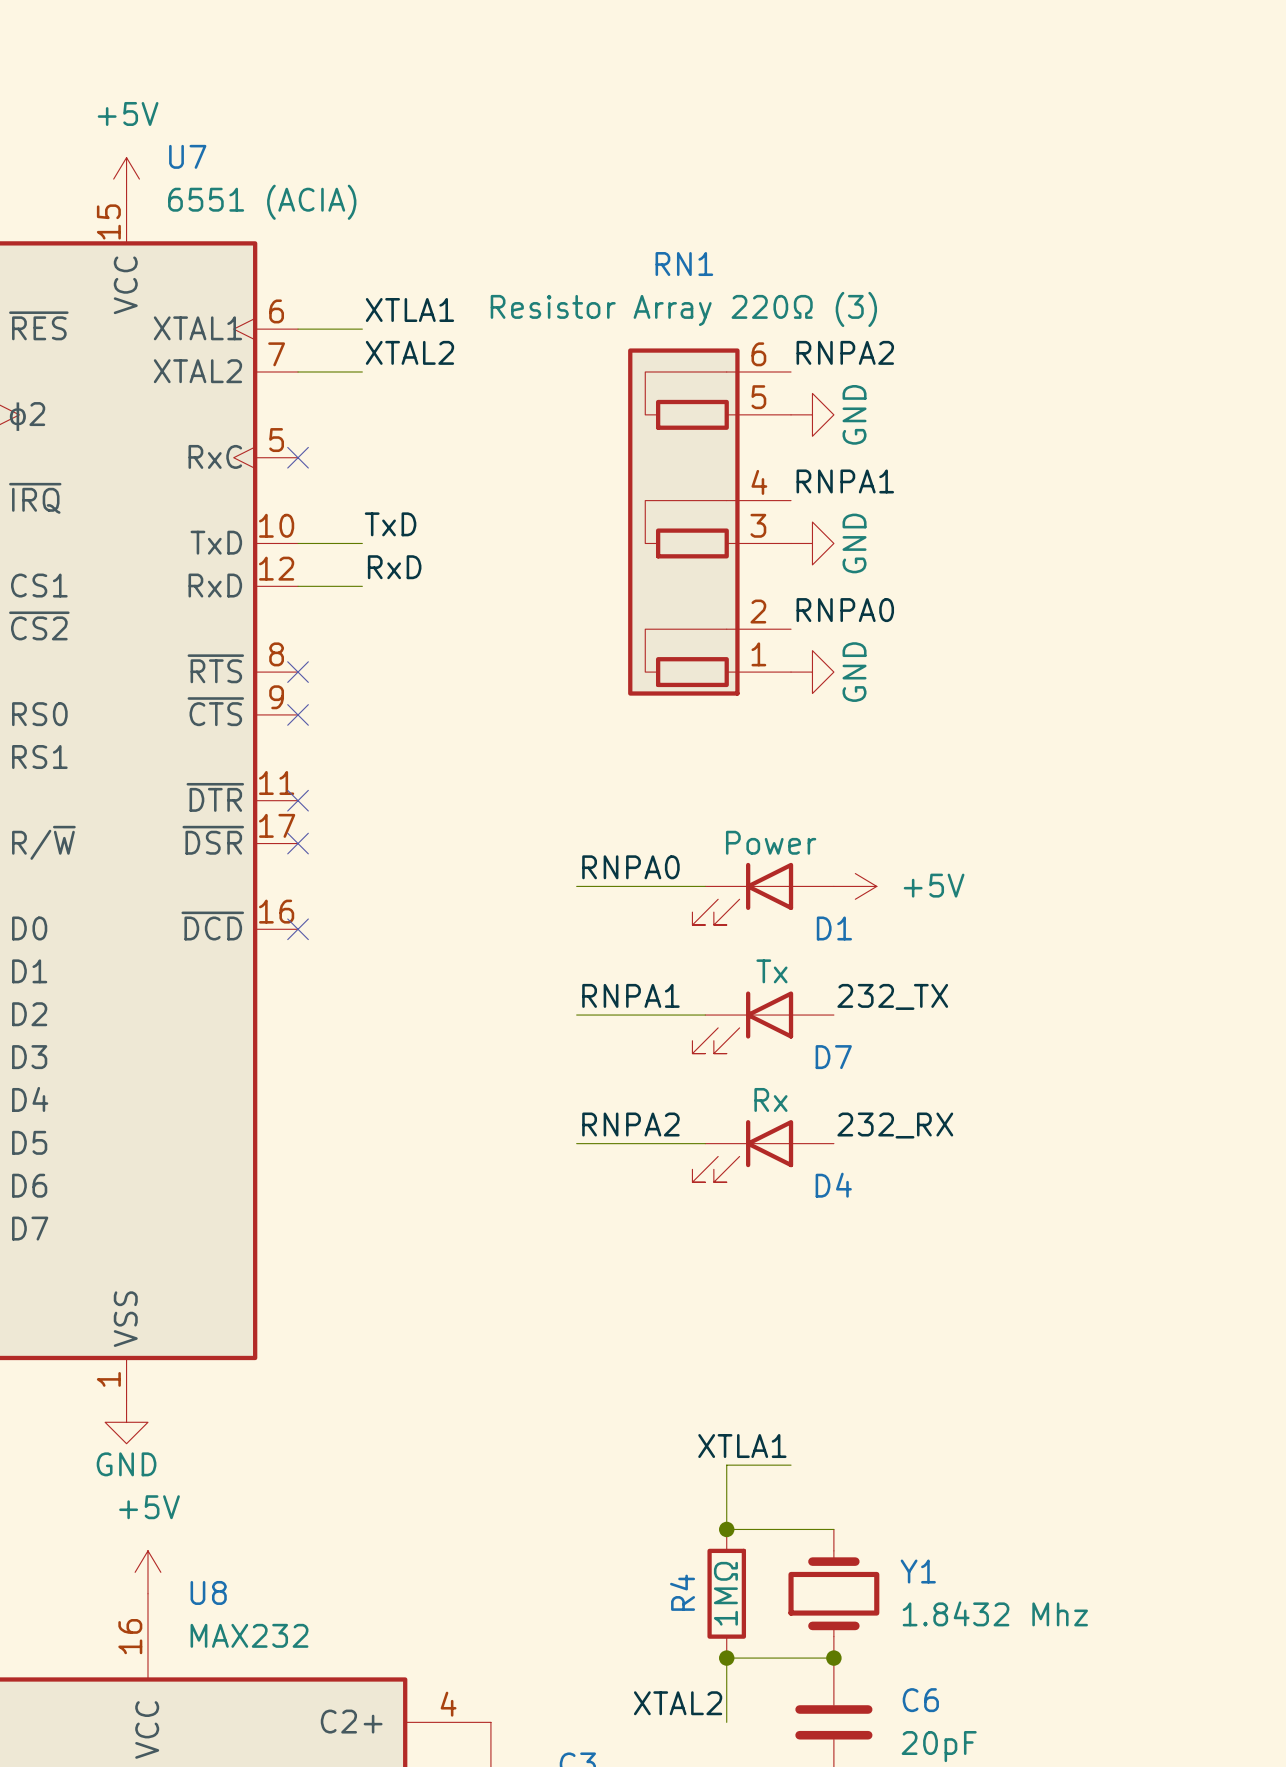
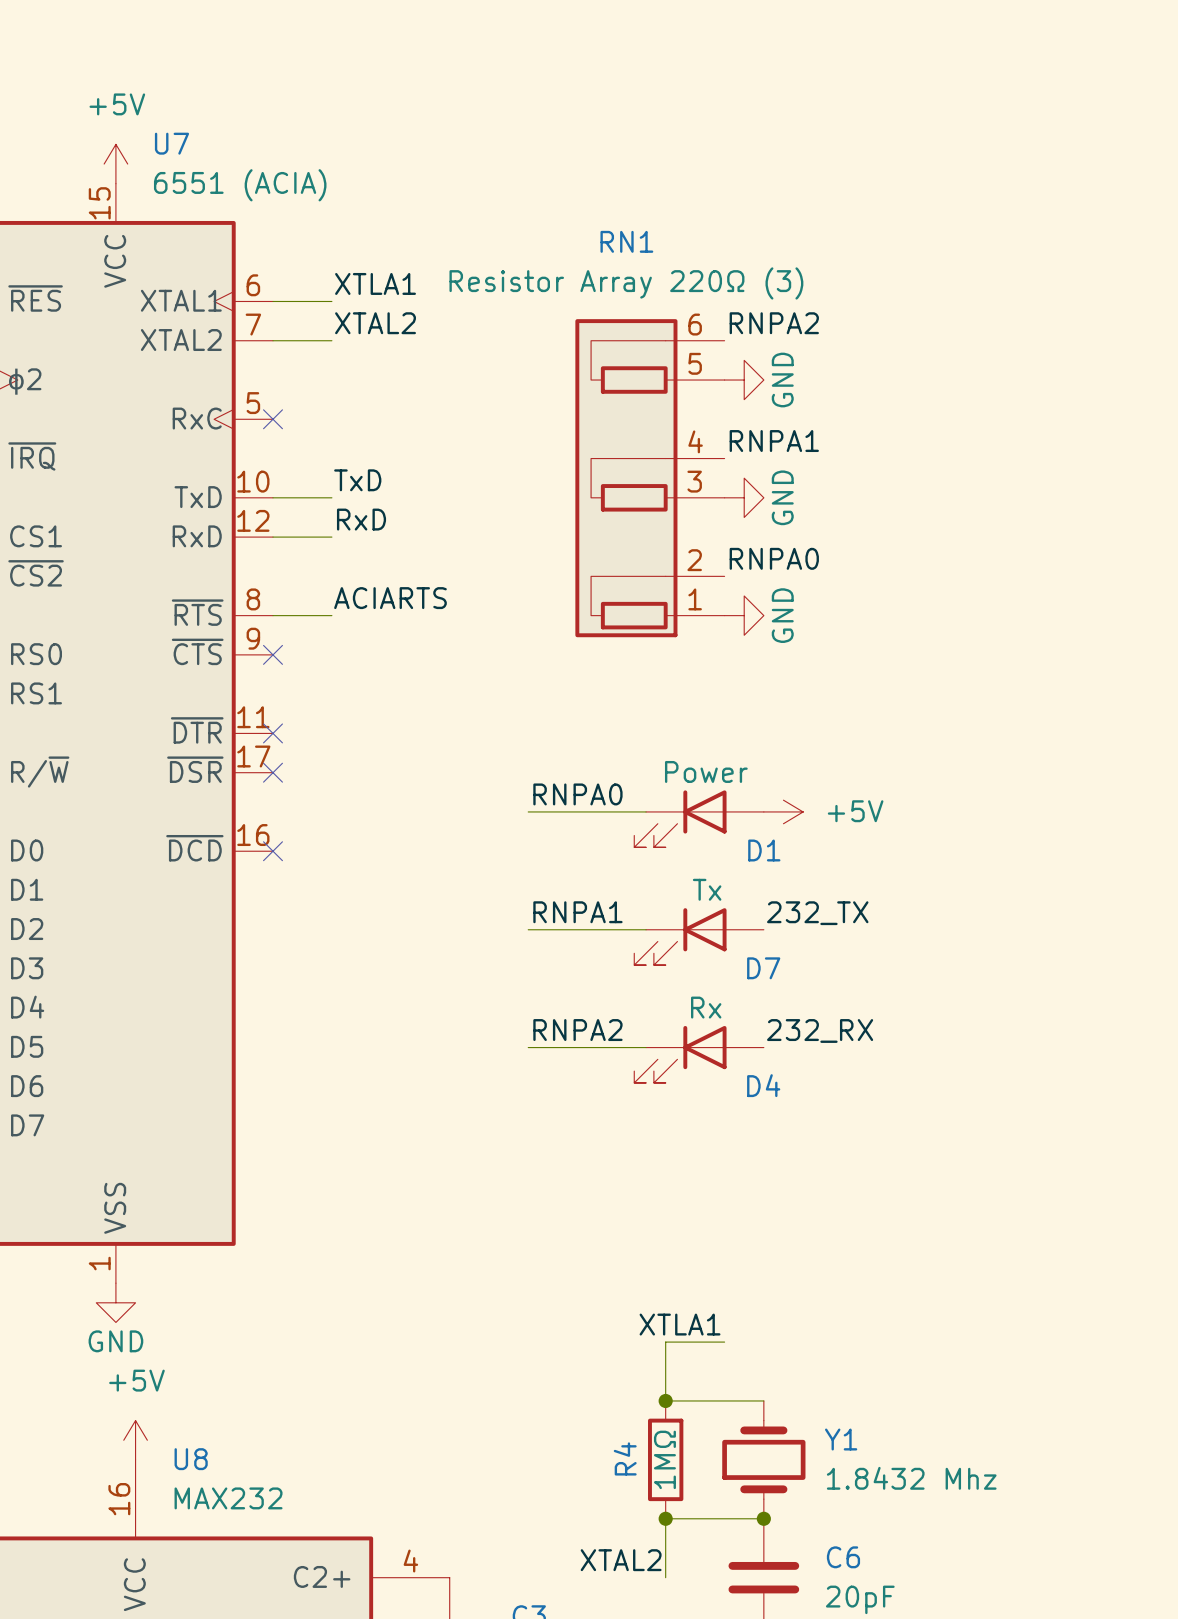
label: none -> ACIARTS (390, 598)
wire: none -> (273, 615) (331, 615)
no-connect mark: (298, 672) -> none

